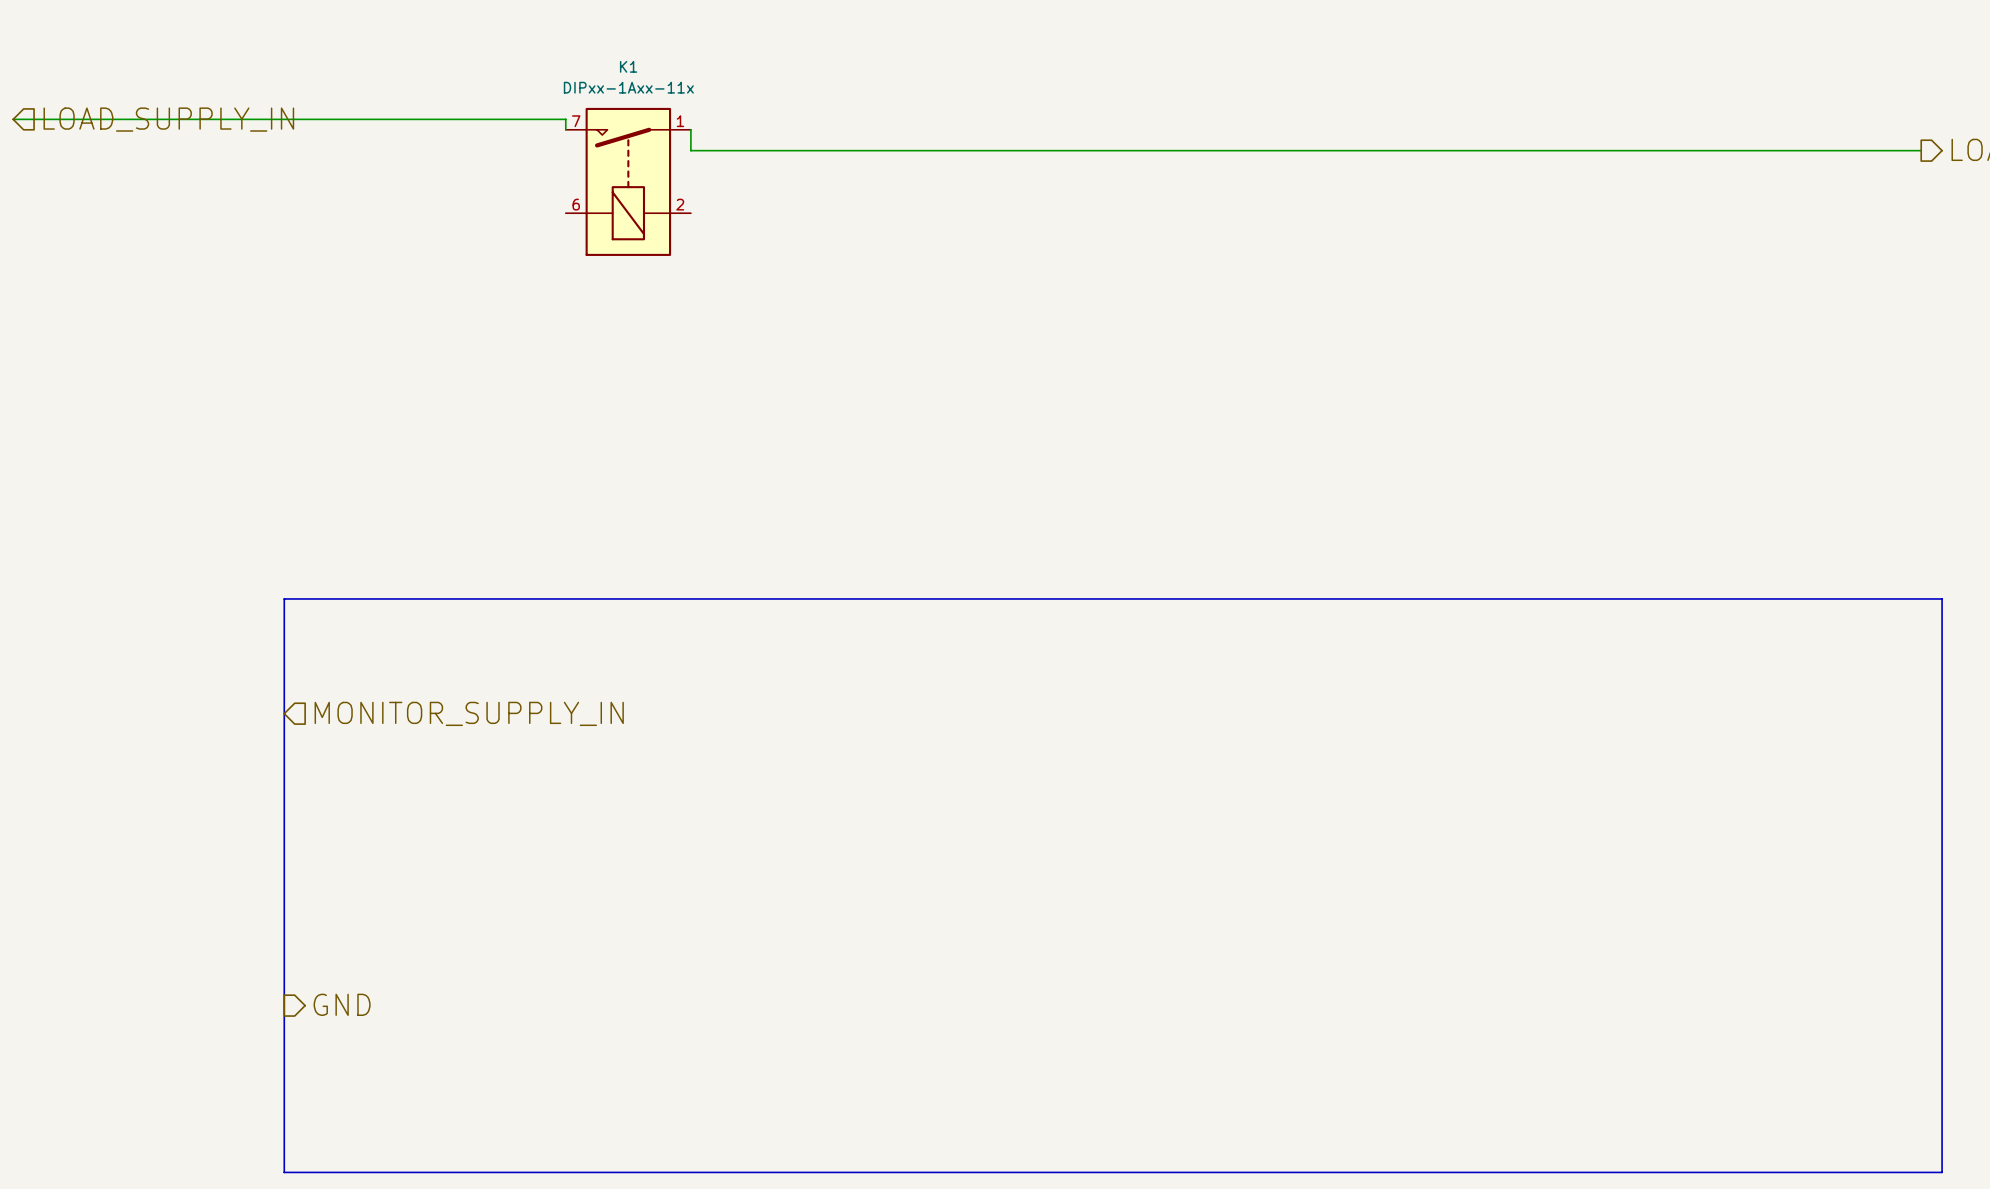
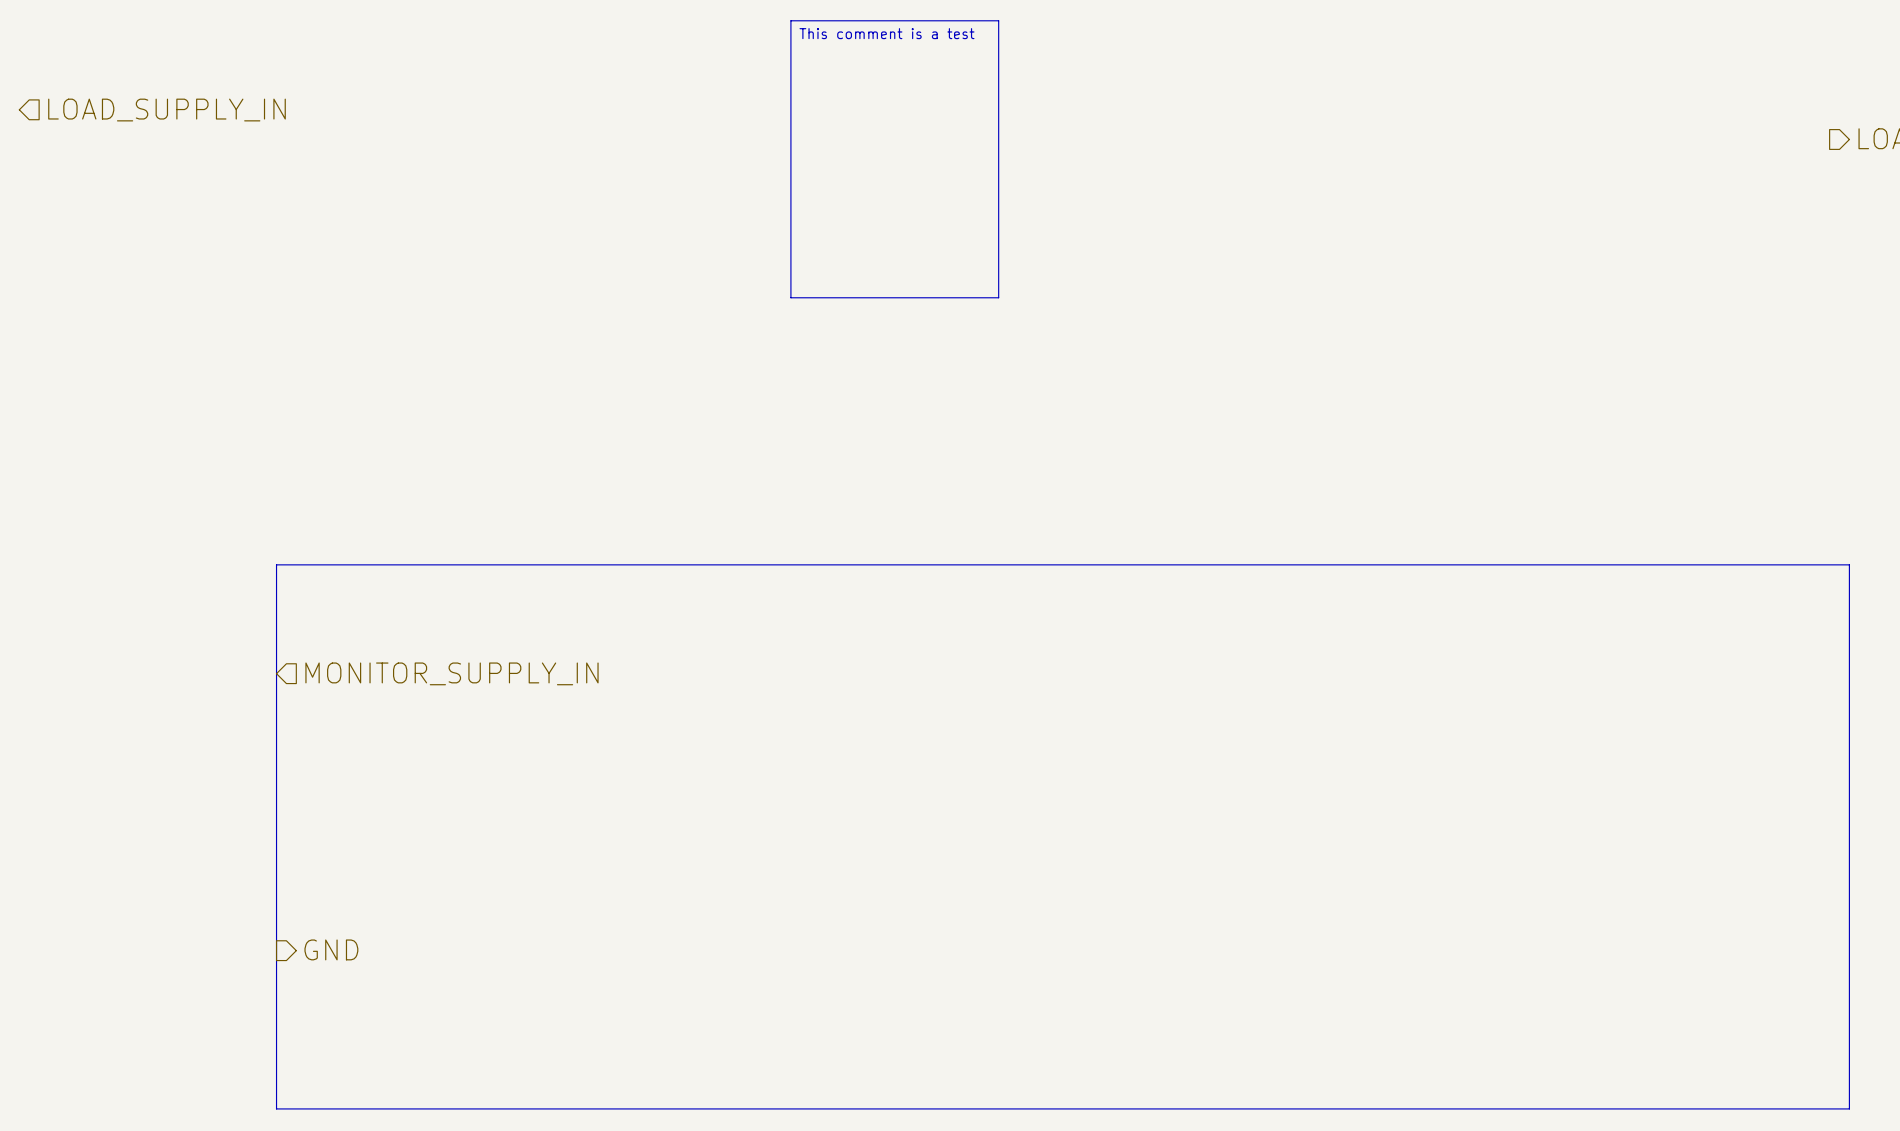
line: none -> (790, 20) (998, 20) (998, 297) (790, 297) (790, 20)
text: none -> This comment is a test (886, 33)
wire: (13, 119) (565, 119) (565, 129) -> none
wire: (690, 129) (690, 150) (1921, 150) -> none
K1: DIPxx-1Axx-11x (628, 181) -> none

